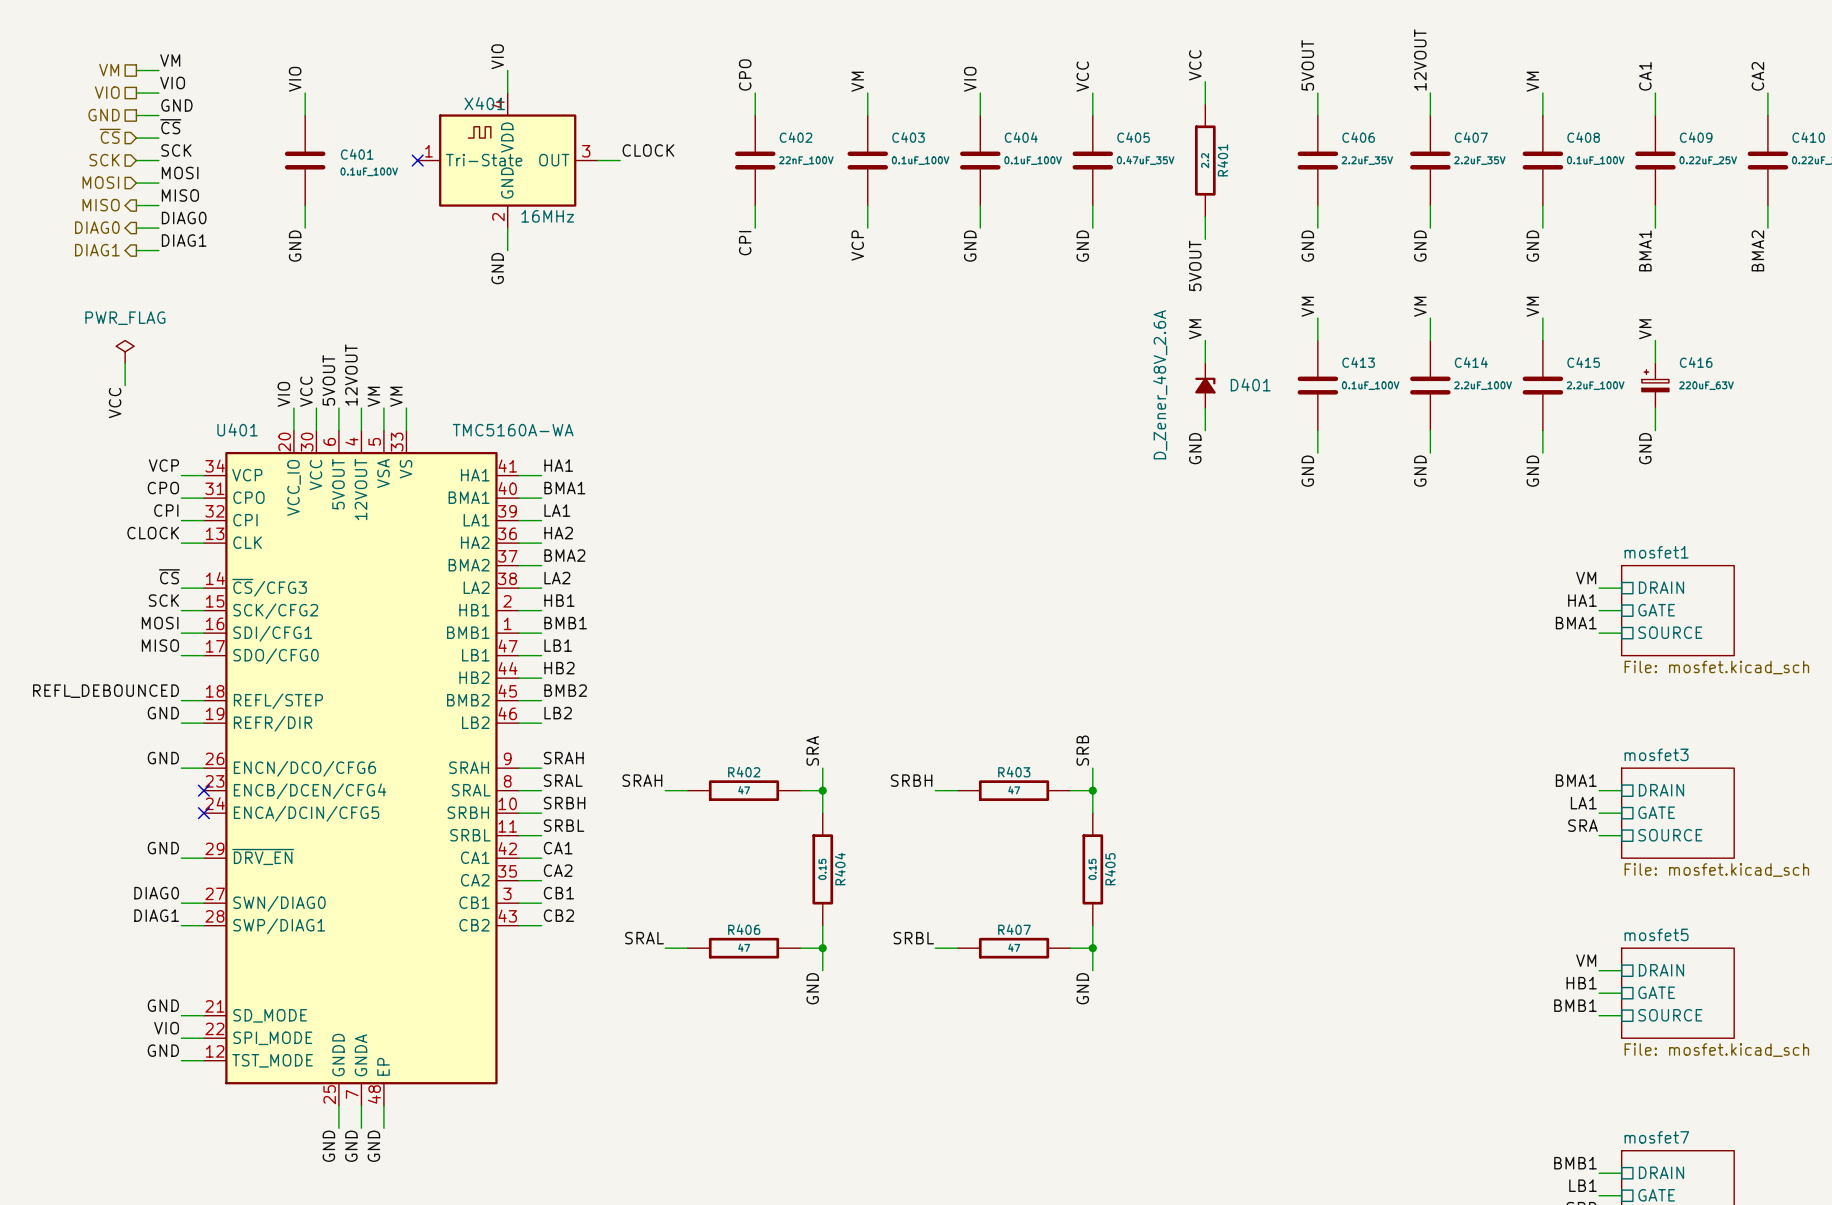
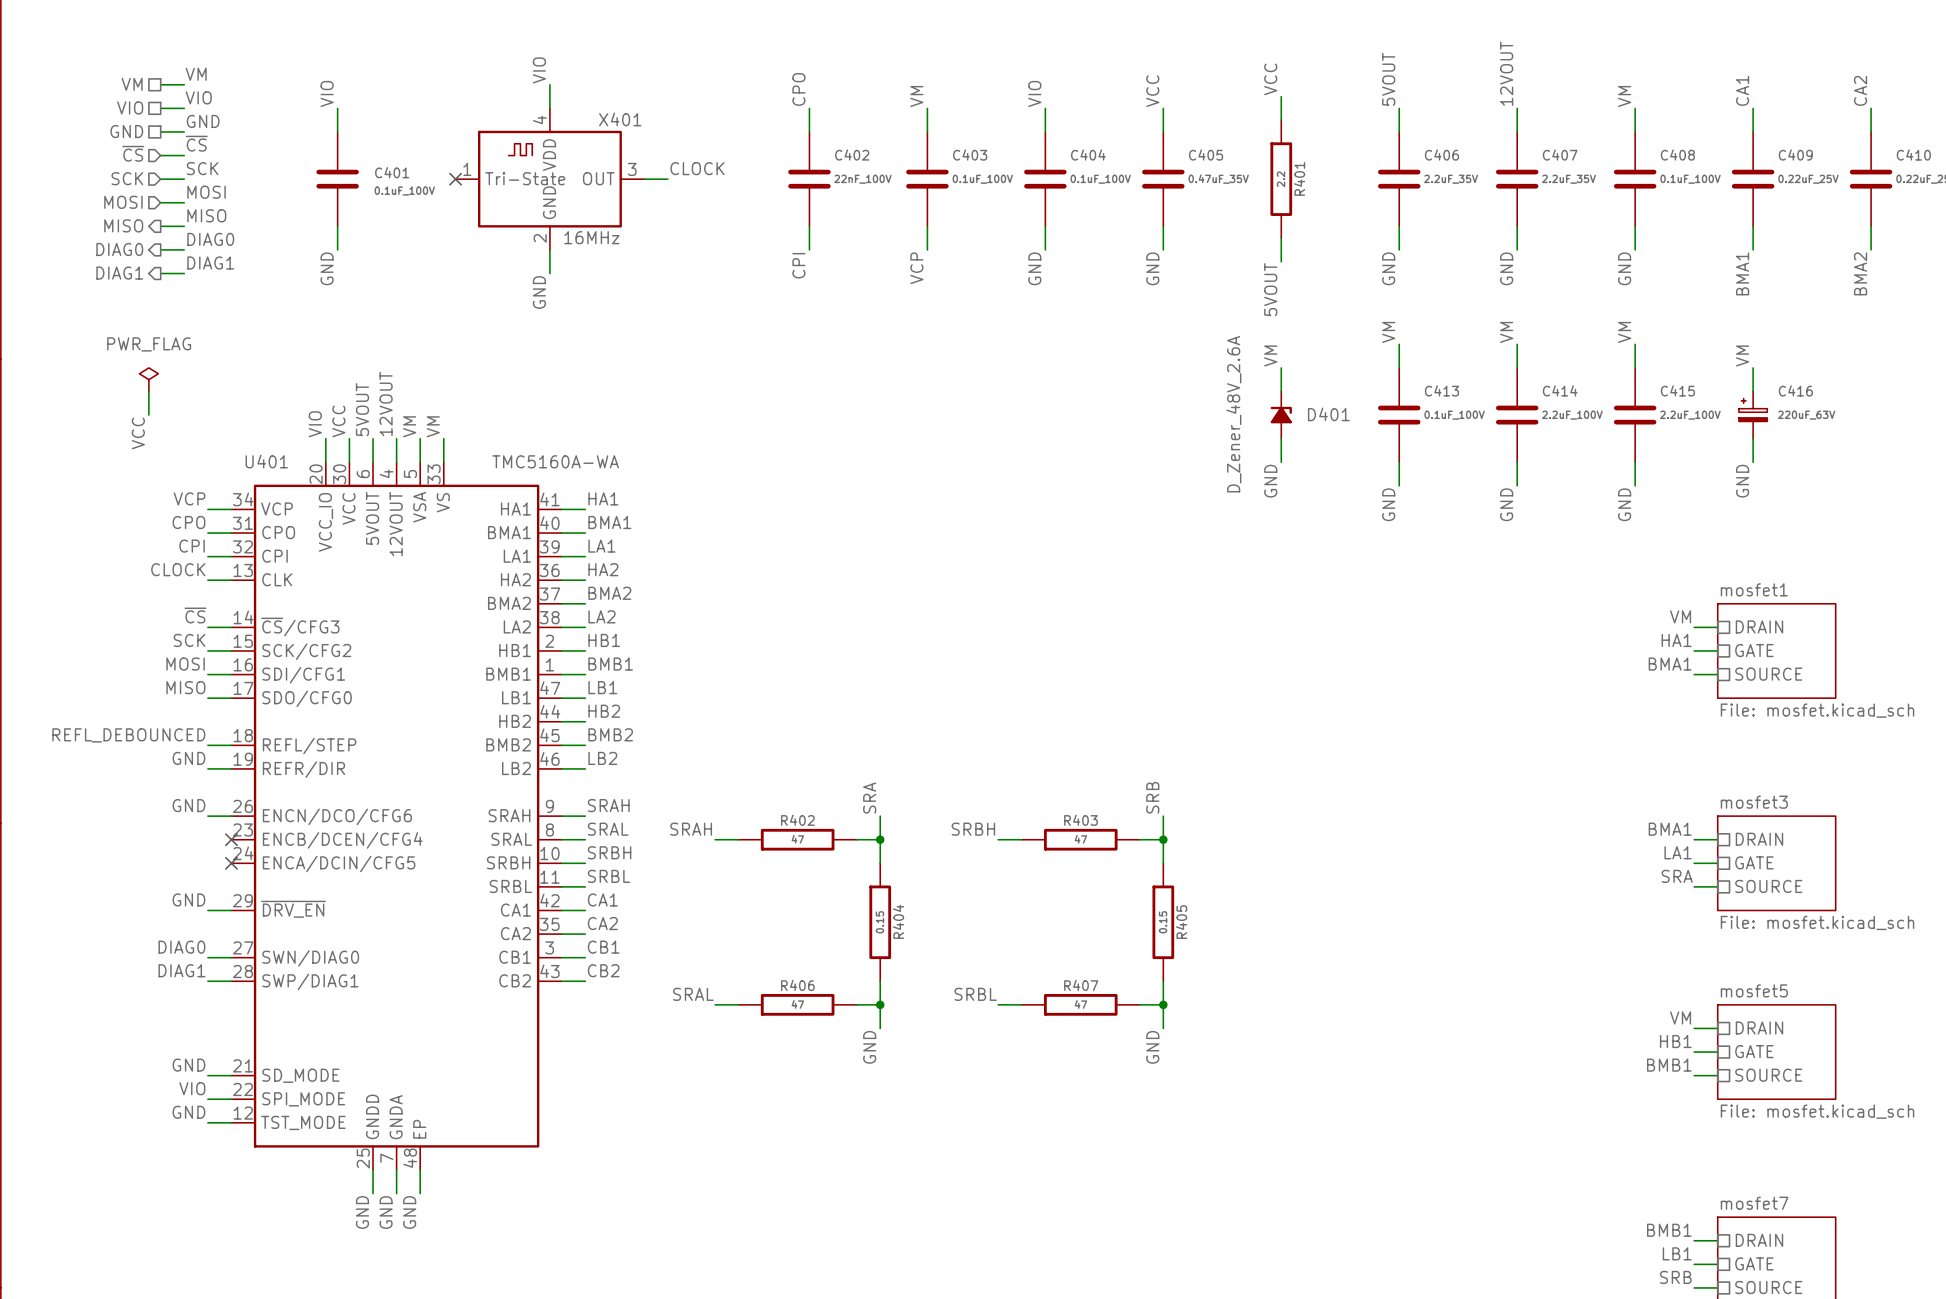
X401 name position: X401 (484, 103) -> X401 (620, 119)

